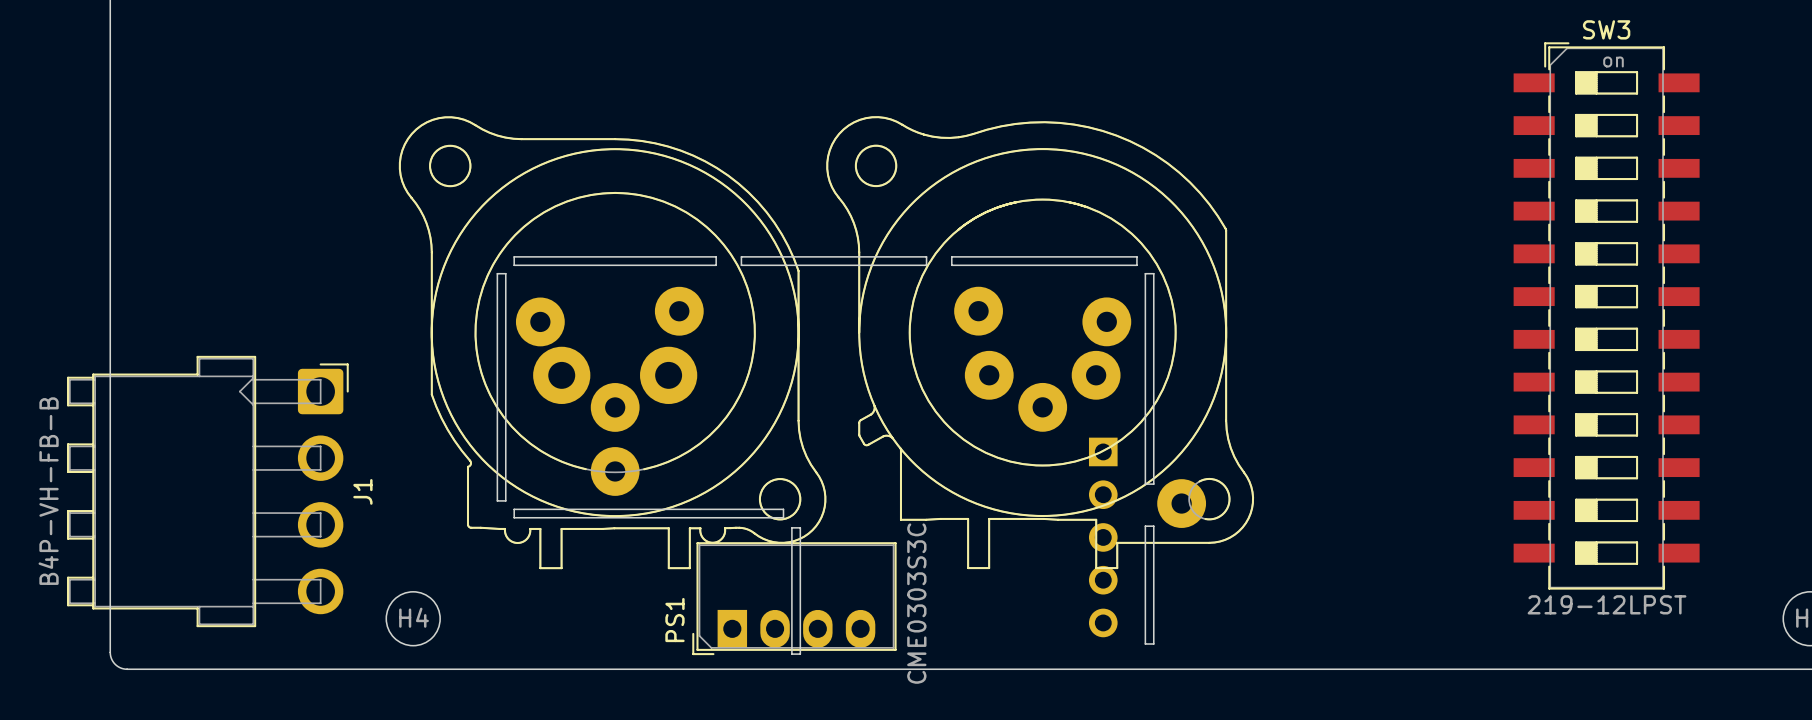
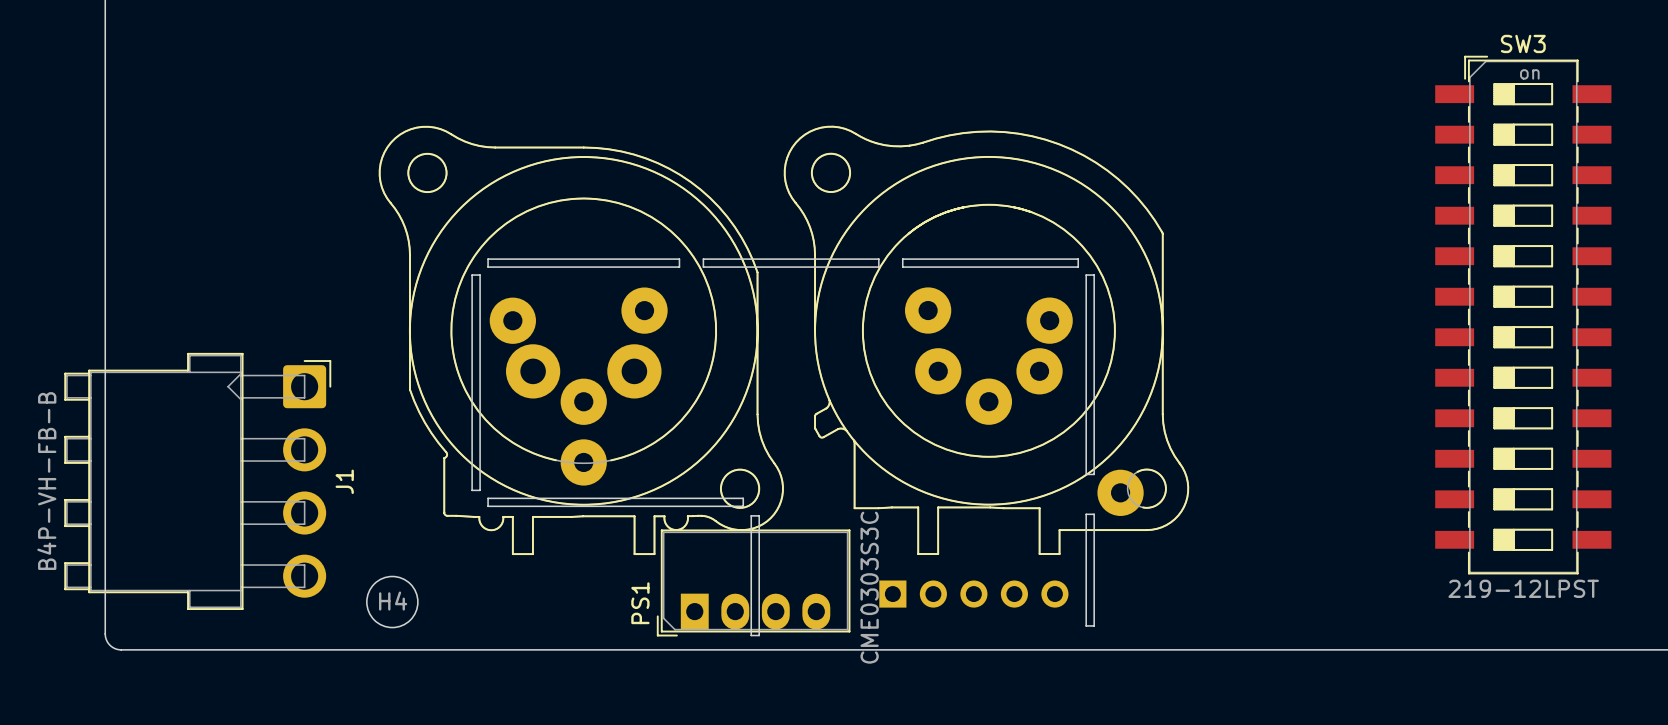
part rotation: 0° (1103, 537) -> 90° counterclockwise (973, 594)

